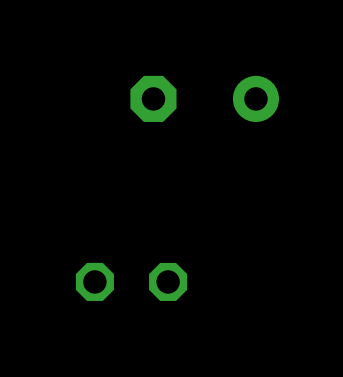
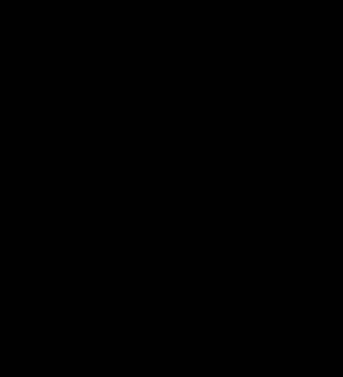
part: (204, 98) -> none
part: (131, 281) -> none

